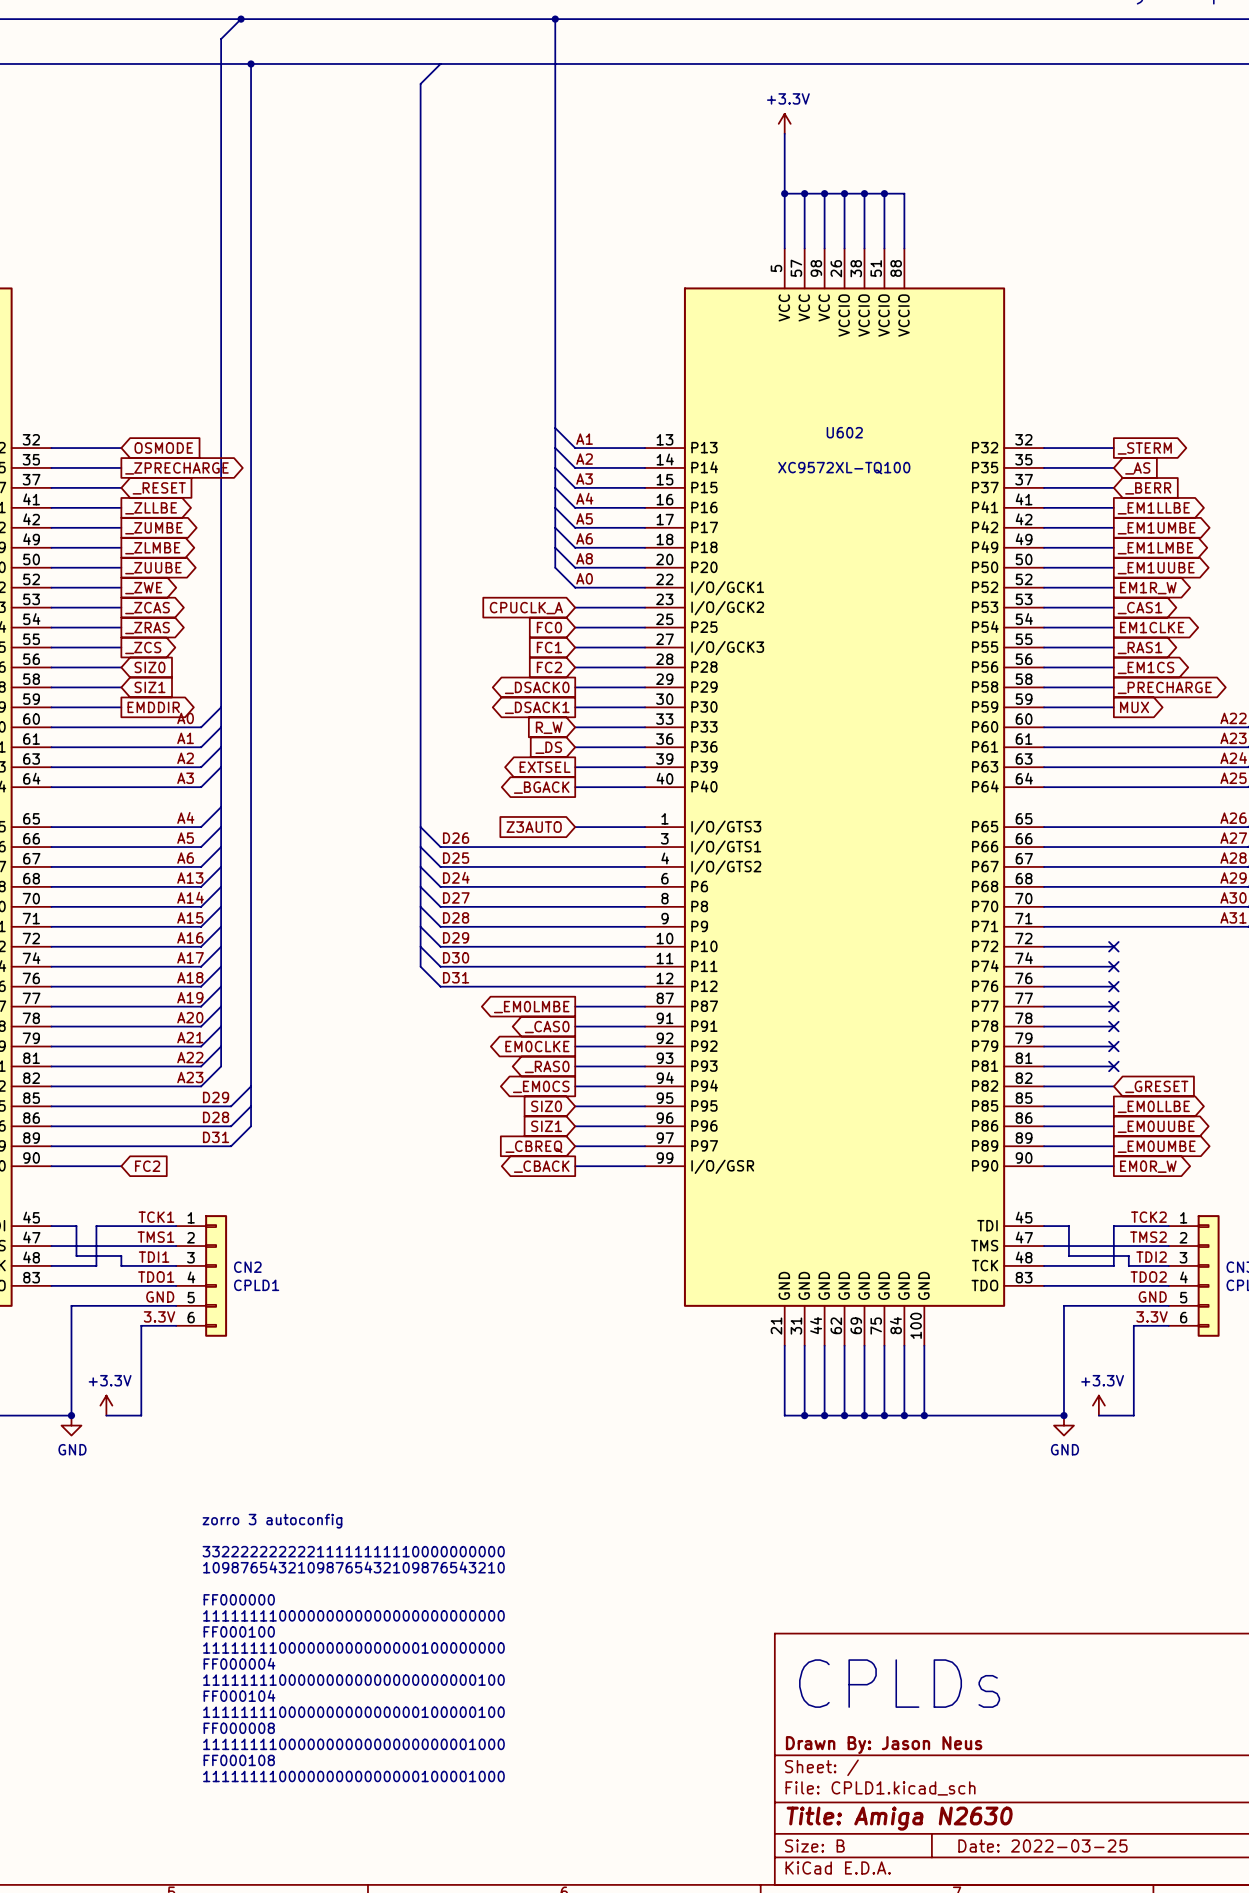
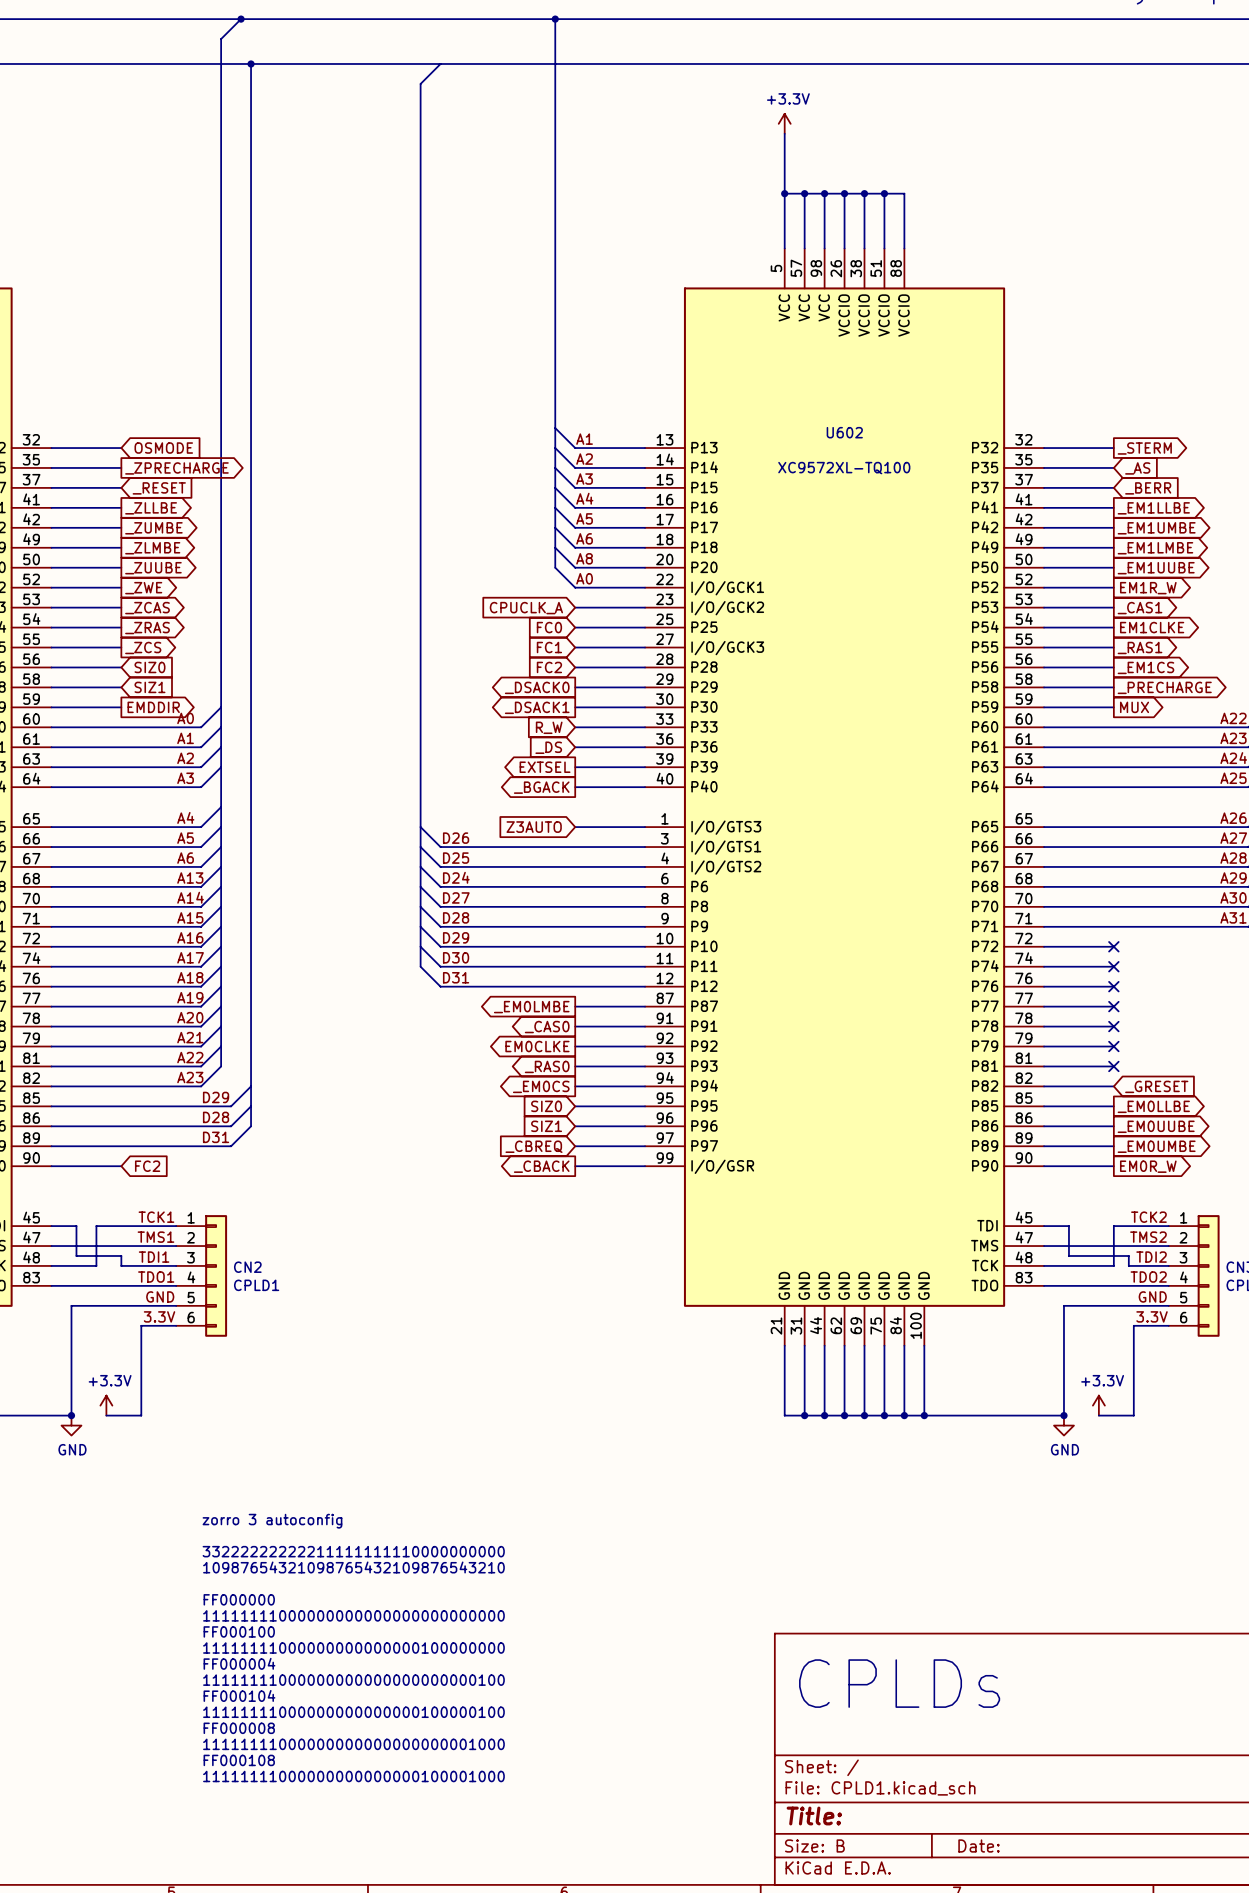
title block: Drawn By: Jason Neus (884, 1745) -> none
title block: Title: Amiga N2630 (899, 1818) -> Title: (814, 1816)
title block: Date: 2022-03-25 (1042, 1845) -> Date: (978, 1845)

